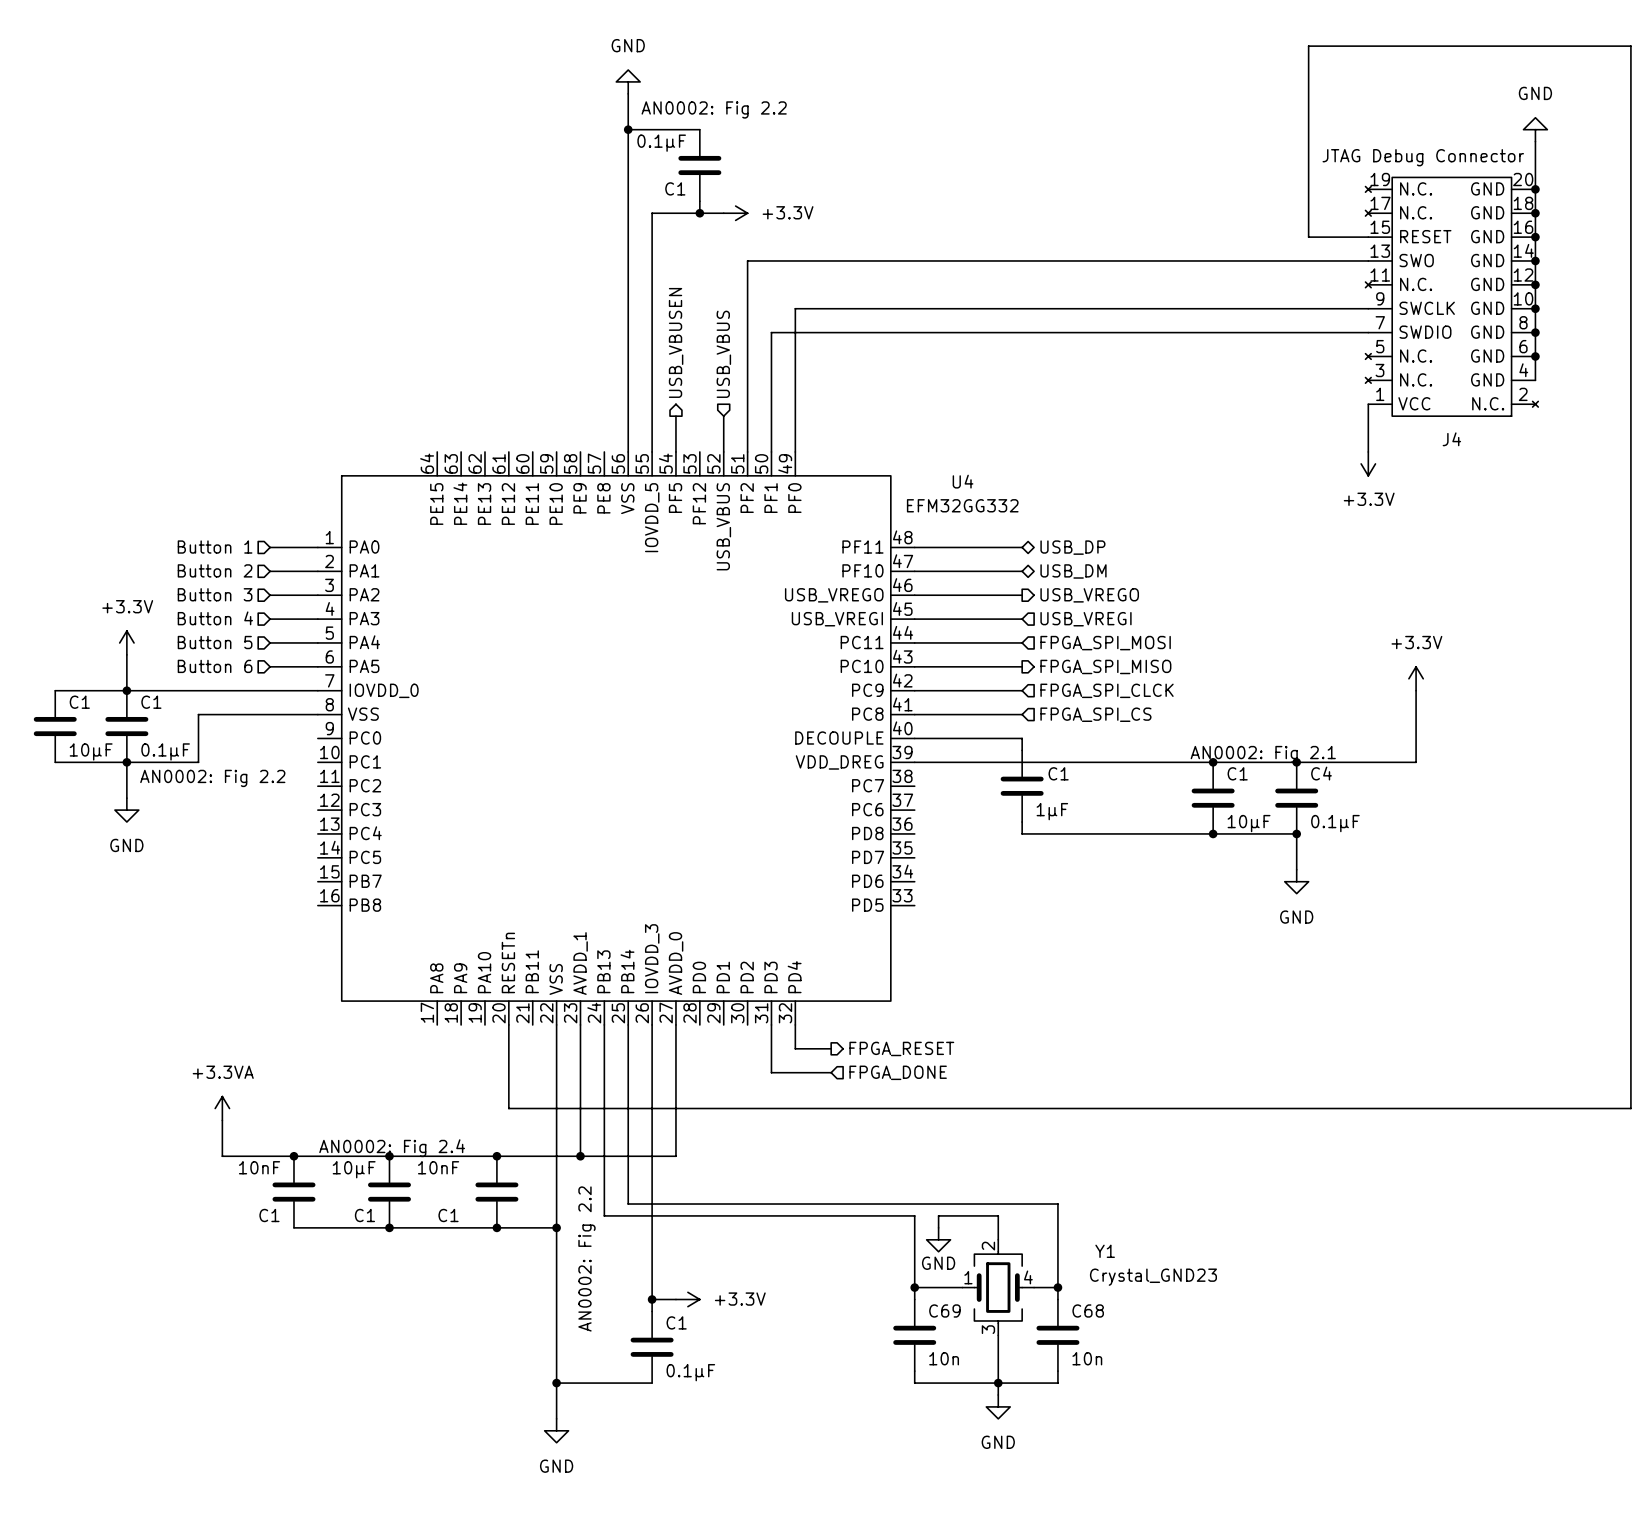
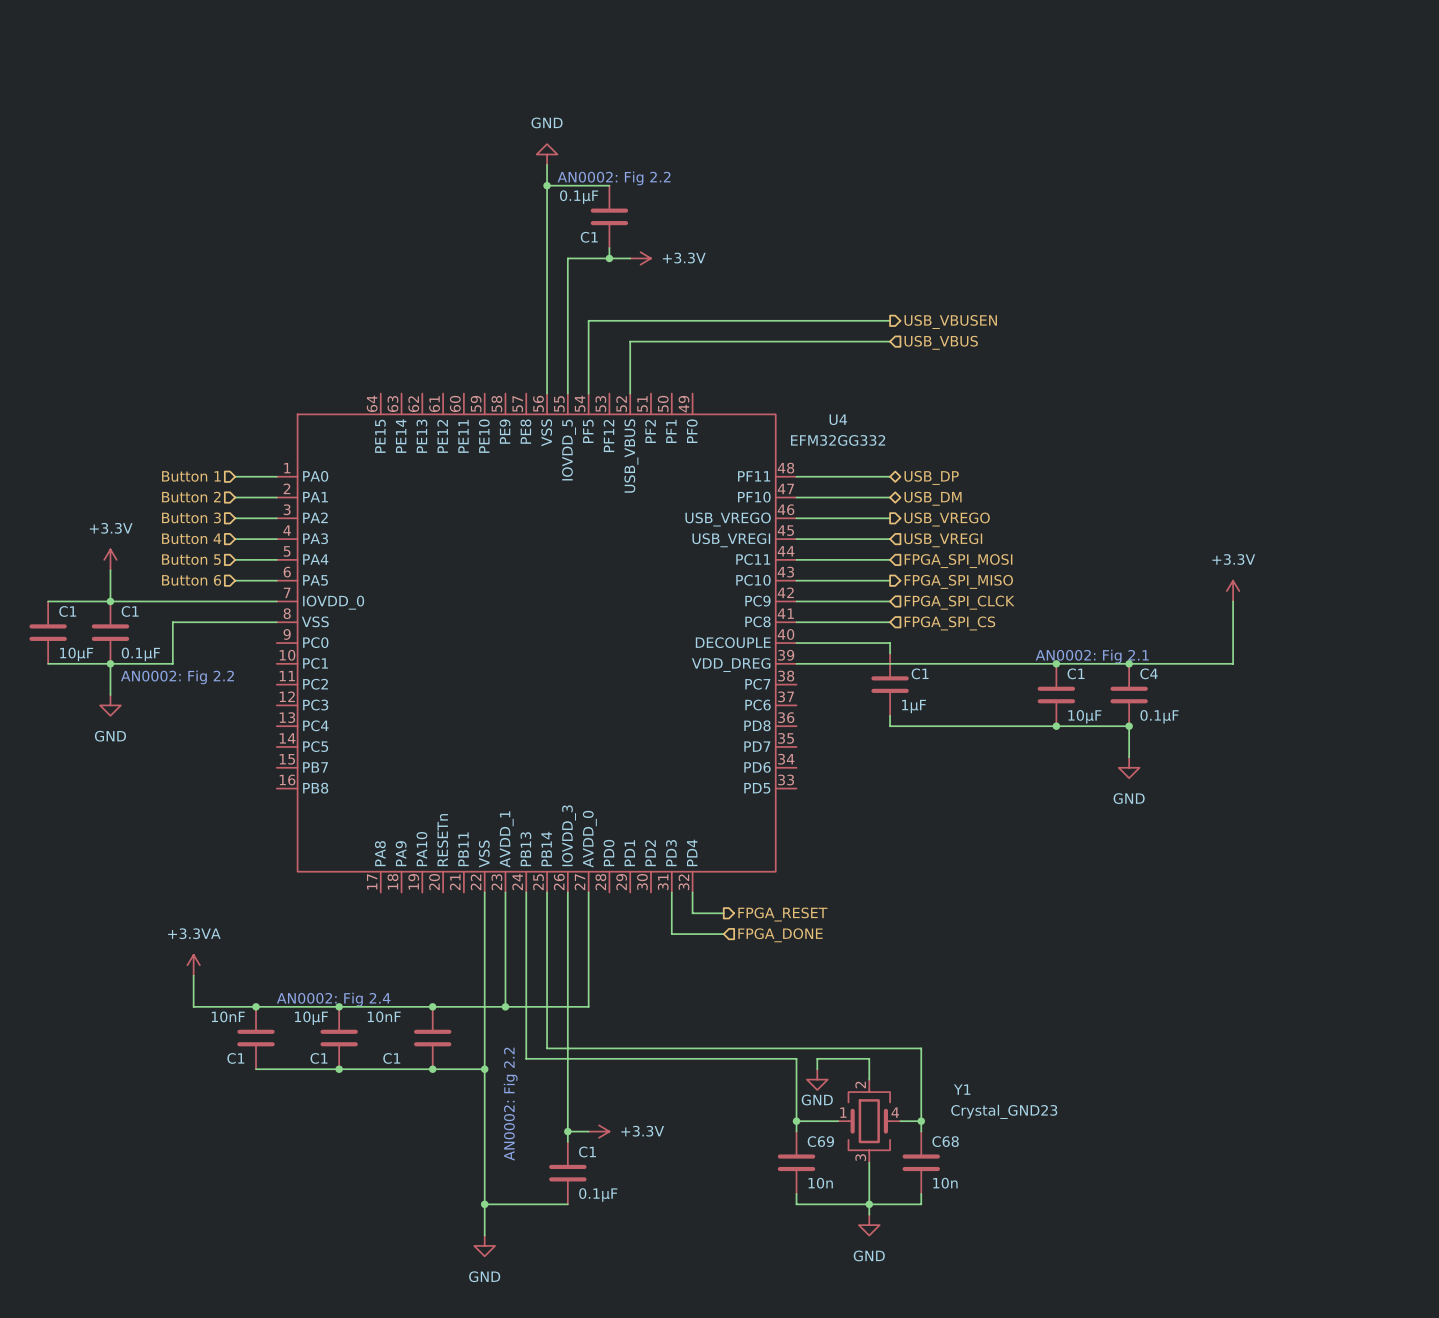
power symbol position: GND (628, 81) -> GND (547, 154)
wire: (628, 93) (628, 189) -> none
text position: AN0002: Fig 2.2 (714, 109) -> AN0002: Fig 2.2 (614, 178)
wire: (628, 129) (699, 129) -> (567, 258) (630, 258)
junction: (628, 129) -> none
power symbol: GND (1535, 129) -> none
wire: (1535, 141) (1535, 380) -> none
text: JTAG Debug Connector (1423, 157) -> none
C1 position: (699, 165) -> (609, 216)
junction: (1535, 189) -> none
wire: (699, 201) (699, 213) (723, 213) -> none
junction: none -> (547, 185)
wire: (652, 213) (652, 296) -> (567, 185) (547, 185)
junction: (699, 213) -> none
power symbol position: +3.3V (735, 213) -> +3.3V (640, 258)
junction: (1535, 213) -> none
wire: (1368, 237) (1308, 237) (1308, 46) (1630, 46) (1630, 1108) (508, 1108) (508, 1024) -> none
junction: (1535, 237) -> none
wire: (1368, 260) (747, 260) (747, 451) -> none
junction: (1535, 260) -> none
wire: none -> (609, 248) (609, 258)
junction: (1535, 284) -> none
junction: none -> (609, 258)
J4: (1451, 296) -> none
wire: (1368, 308) (795, 308) (795, 451) -> none
junction: (1535, 308) -> none
wire: (1368, 332) (771, 332) (771, 451) -> none
junction: (1535, 332) -> none
hierarchical label: USB_VBUSEN (676, 342) -> none
hierarchical label: USB_VBUS (723, 354) -> none
junction: (1535, 356) -> none
wire: none -> (890, 320) (588, 320) (588, 362)
hierarchical label: none -> USB_VBUSEN (950, 322)
wire: none -> (890, 341) (630, 341) (630, 362)
hierarchical label: none -> USB_VBUS (941, 342)
wire: (1368, 404) (1368, 451) -> none
power symbol: +3.3V (1368, 463) -> none

